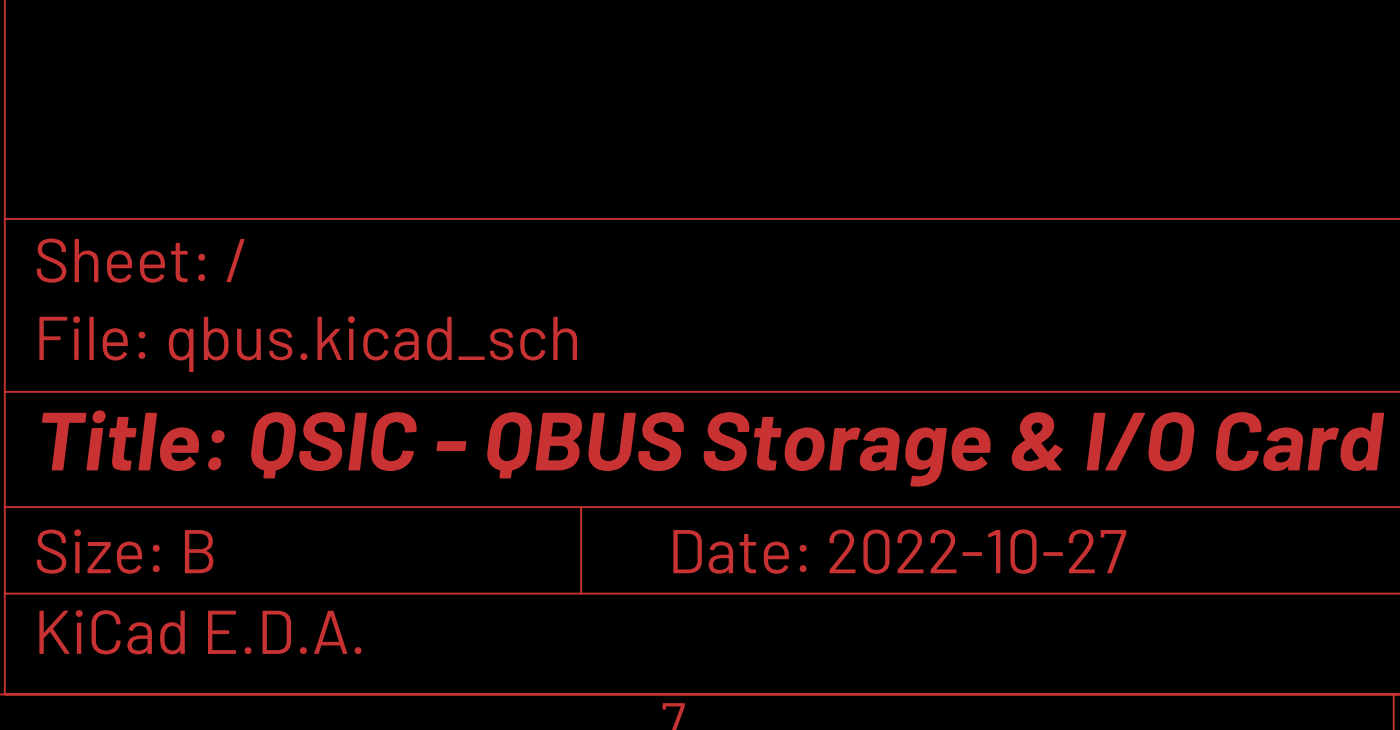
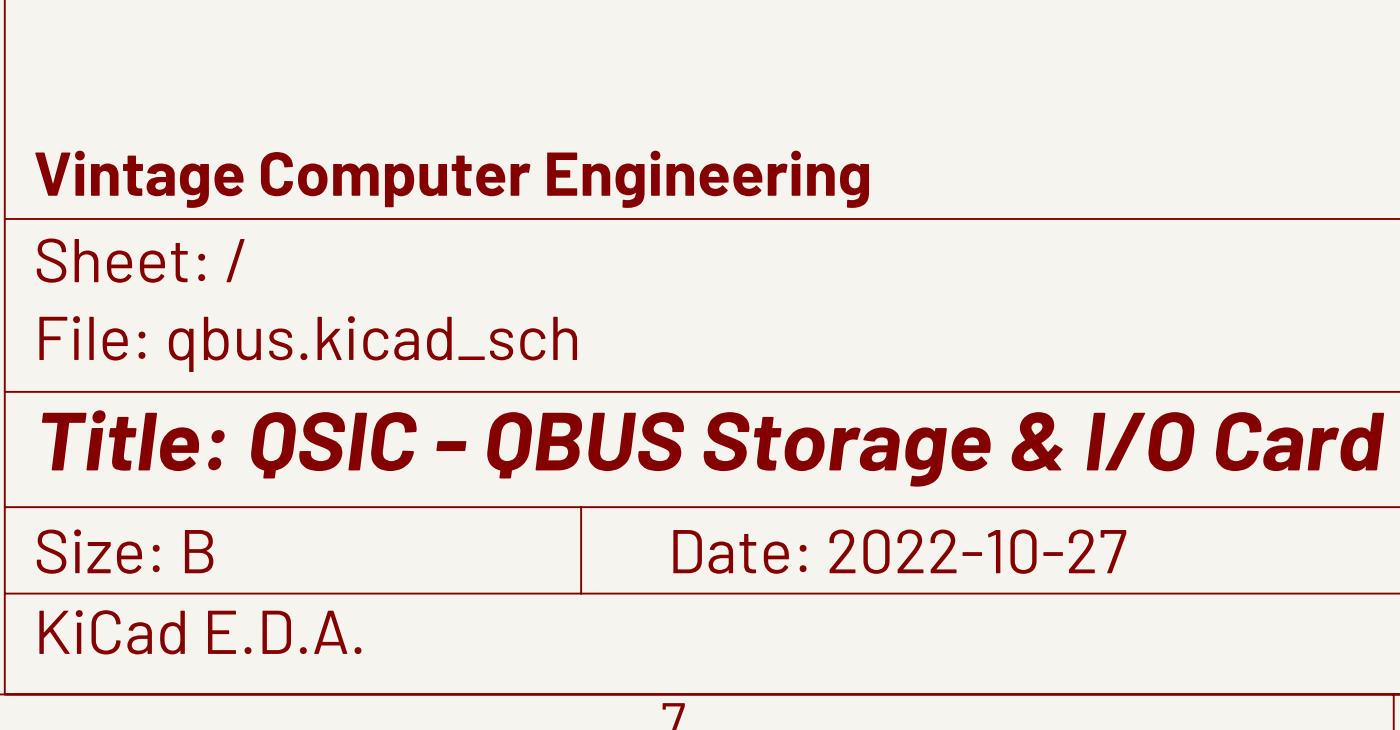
title block: none -> Vintage Computer Engineering (452, 179)

